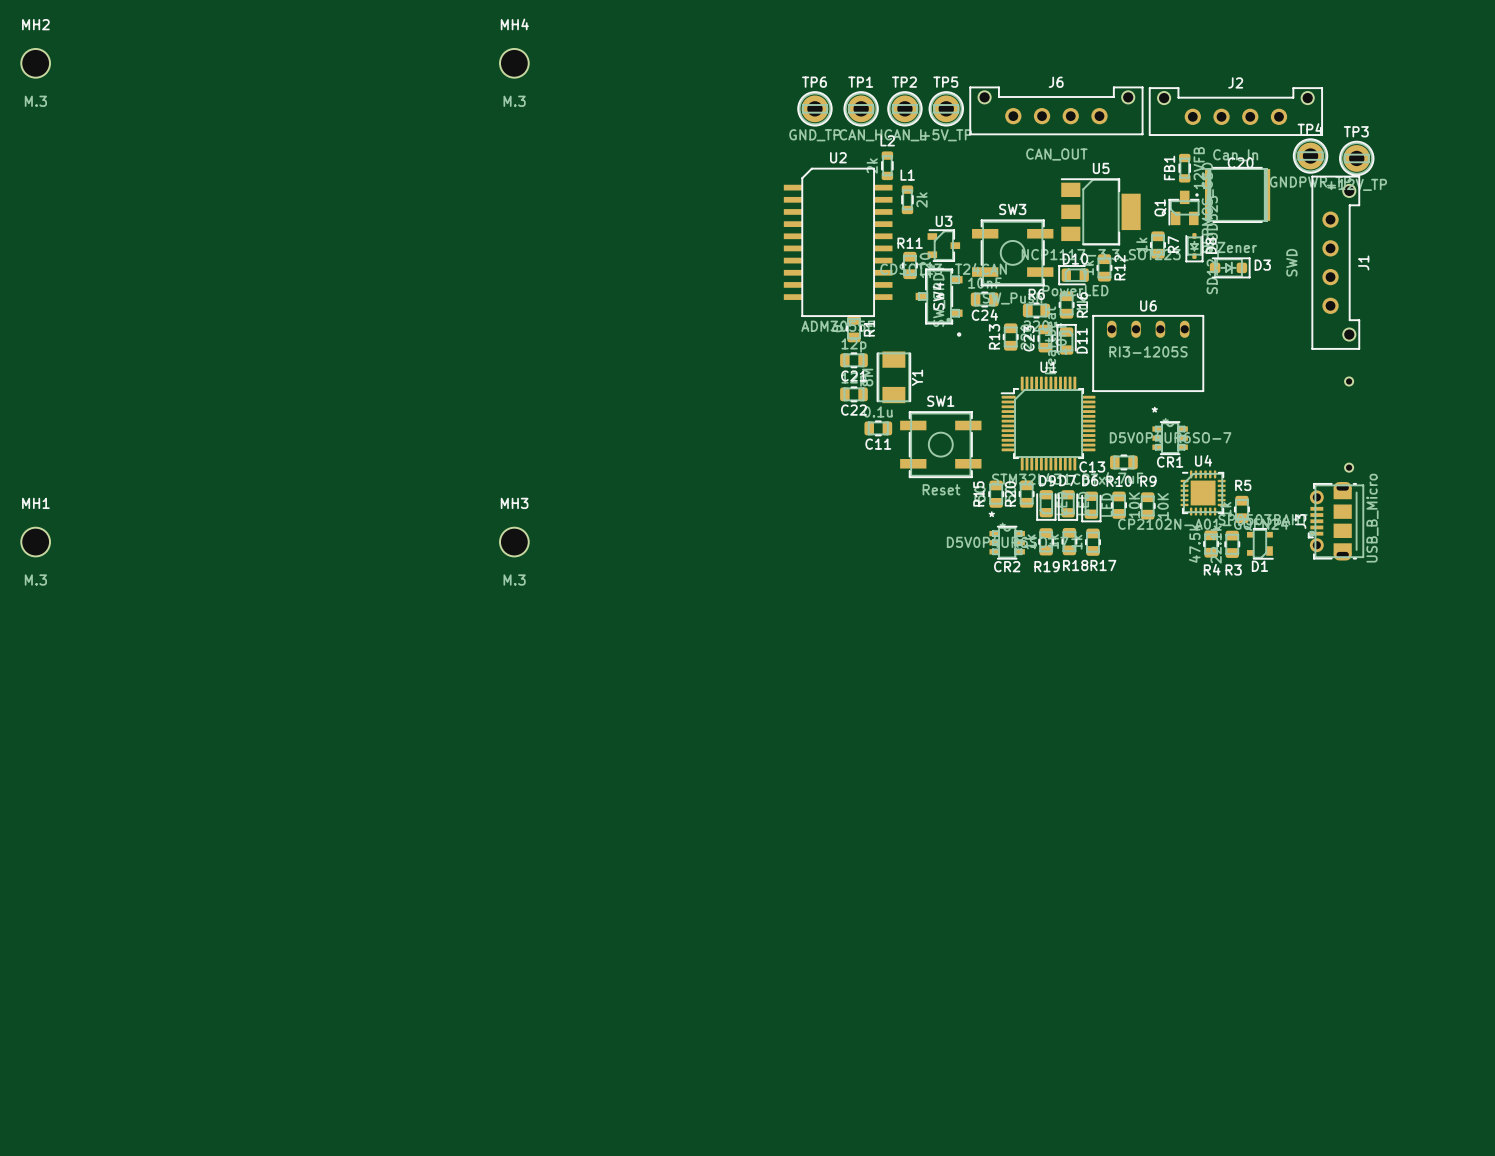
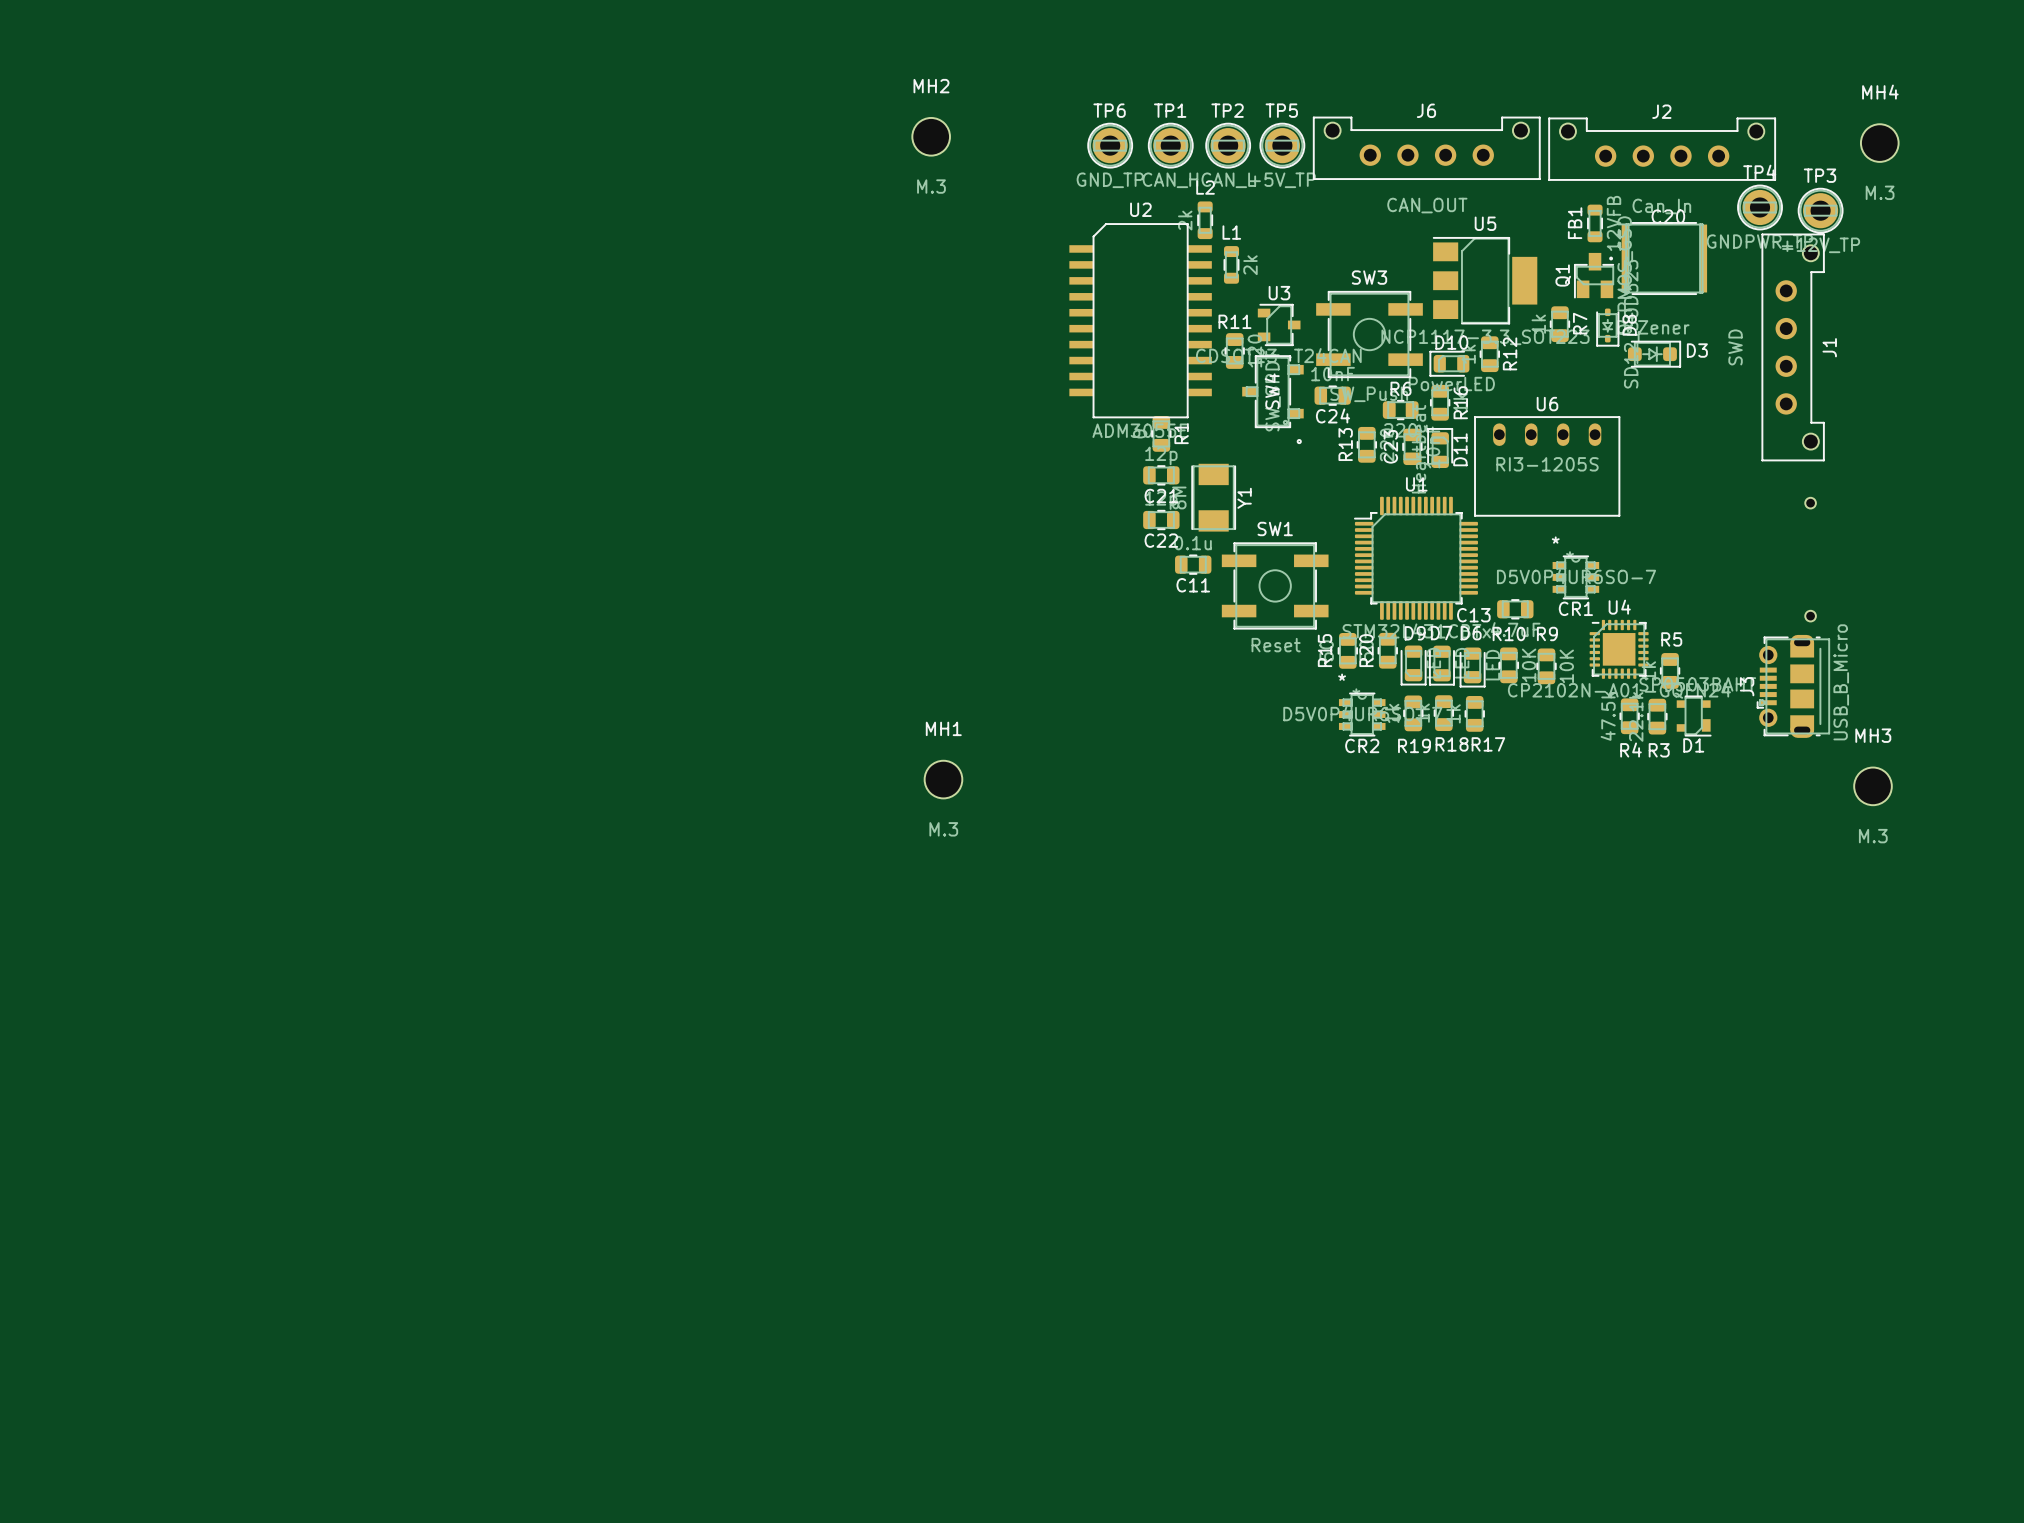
MH2 position: (35, 63) -> (931, 136)
MH4 position: (514, 63) -> (1879, 143)
MH1 position: (35, 542) -> (943, 779)
MH3 position: (514, 542) -> (1873, 786)

